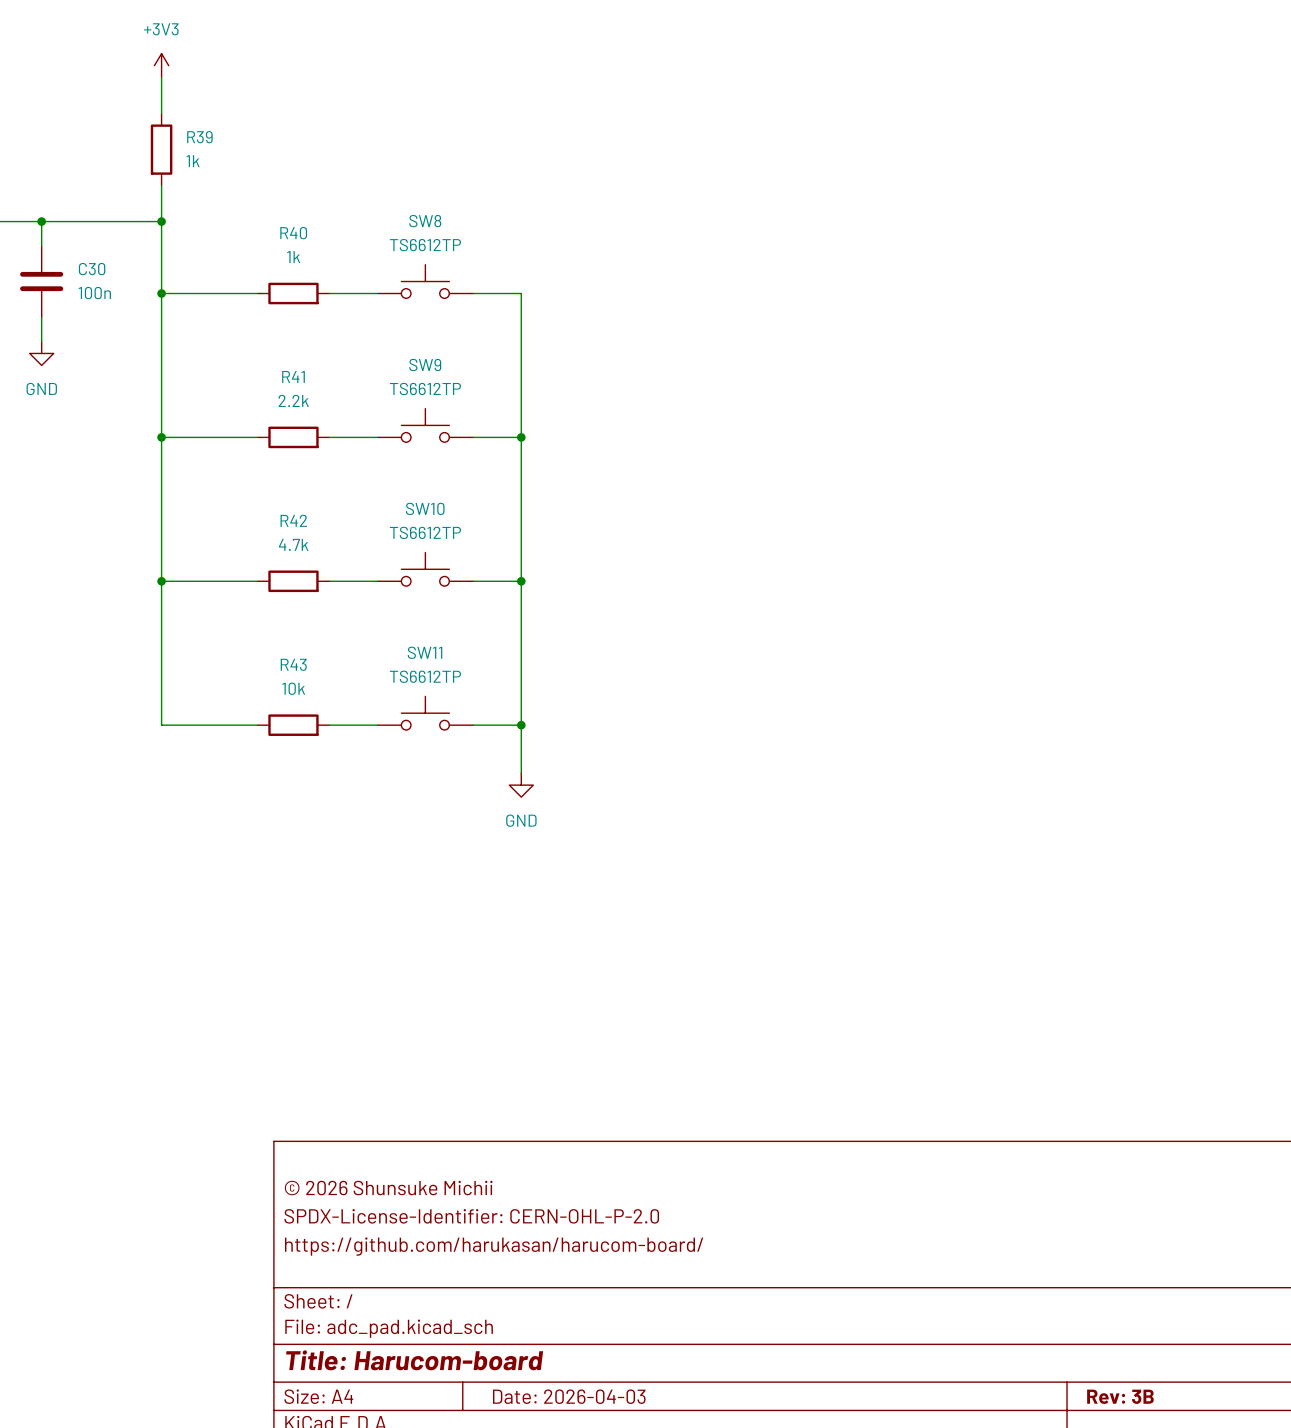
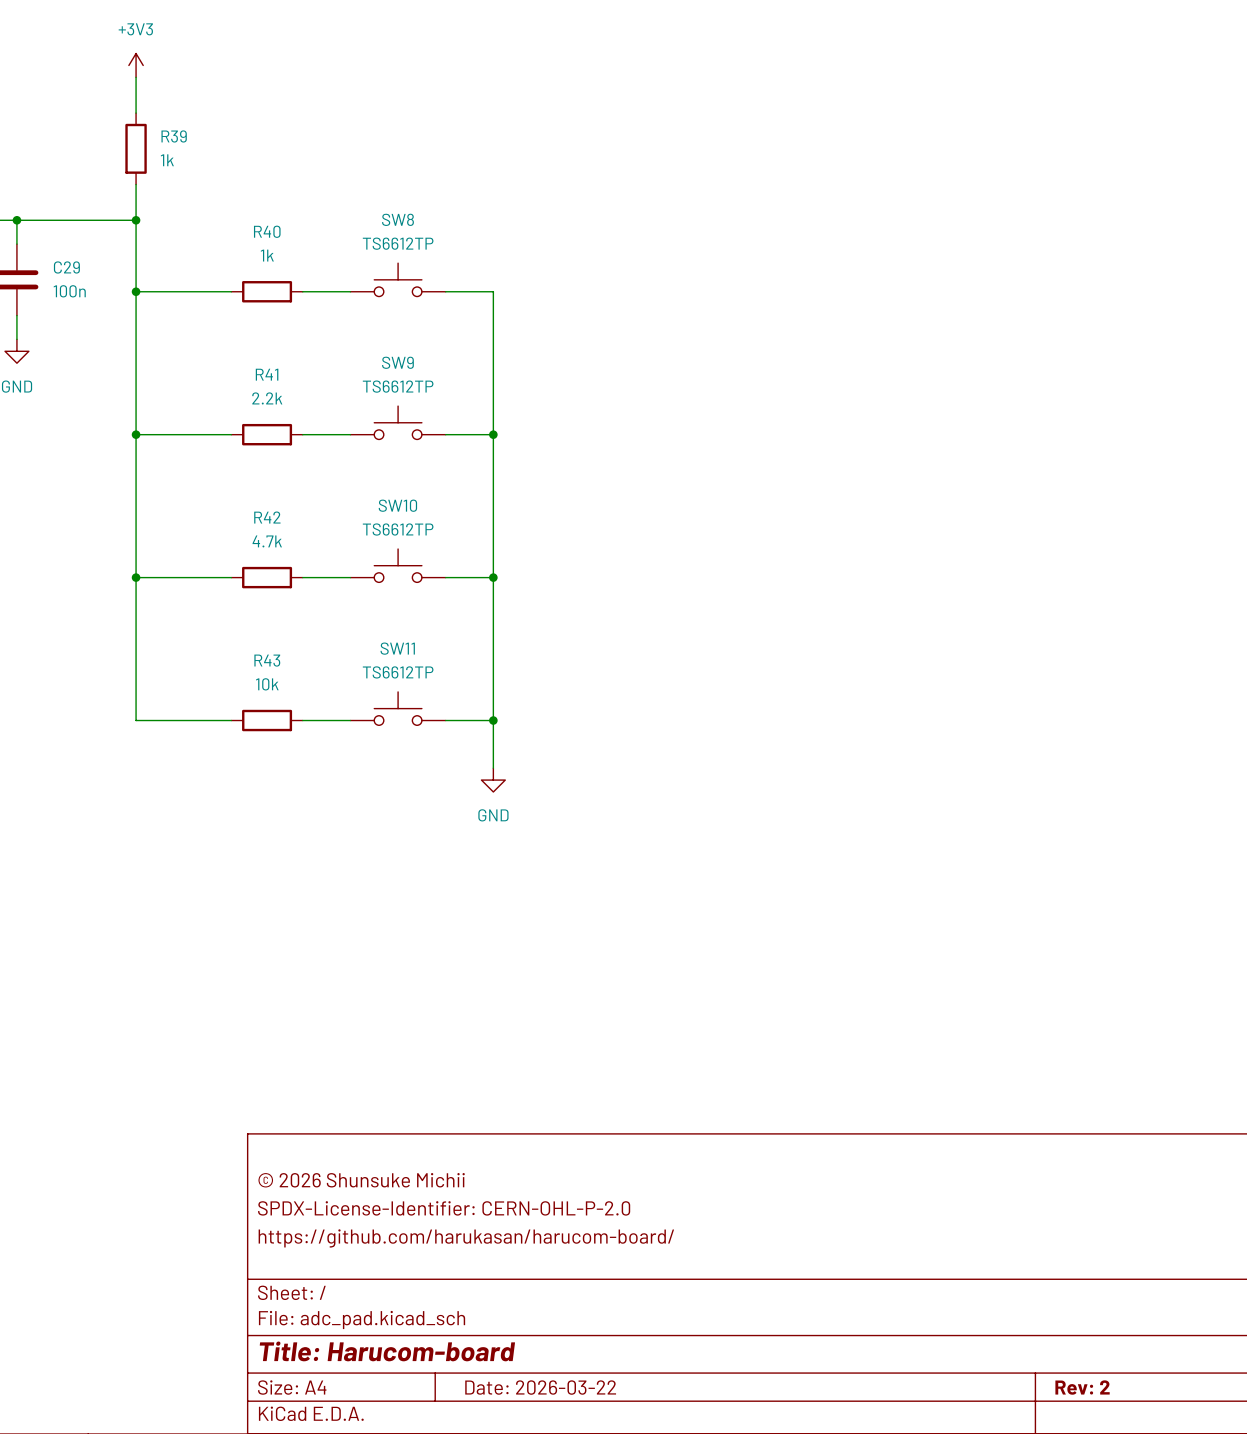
C30 name: C30 (92, 269) -> C29 (66, 267)
title block: Date: 2026-04-03 (569, 1396) -> Date: 2026-03-22 (540, 1387)
title block: Rev: 3B (1120, 1396) -> Rev: 2 (1082, 1387)

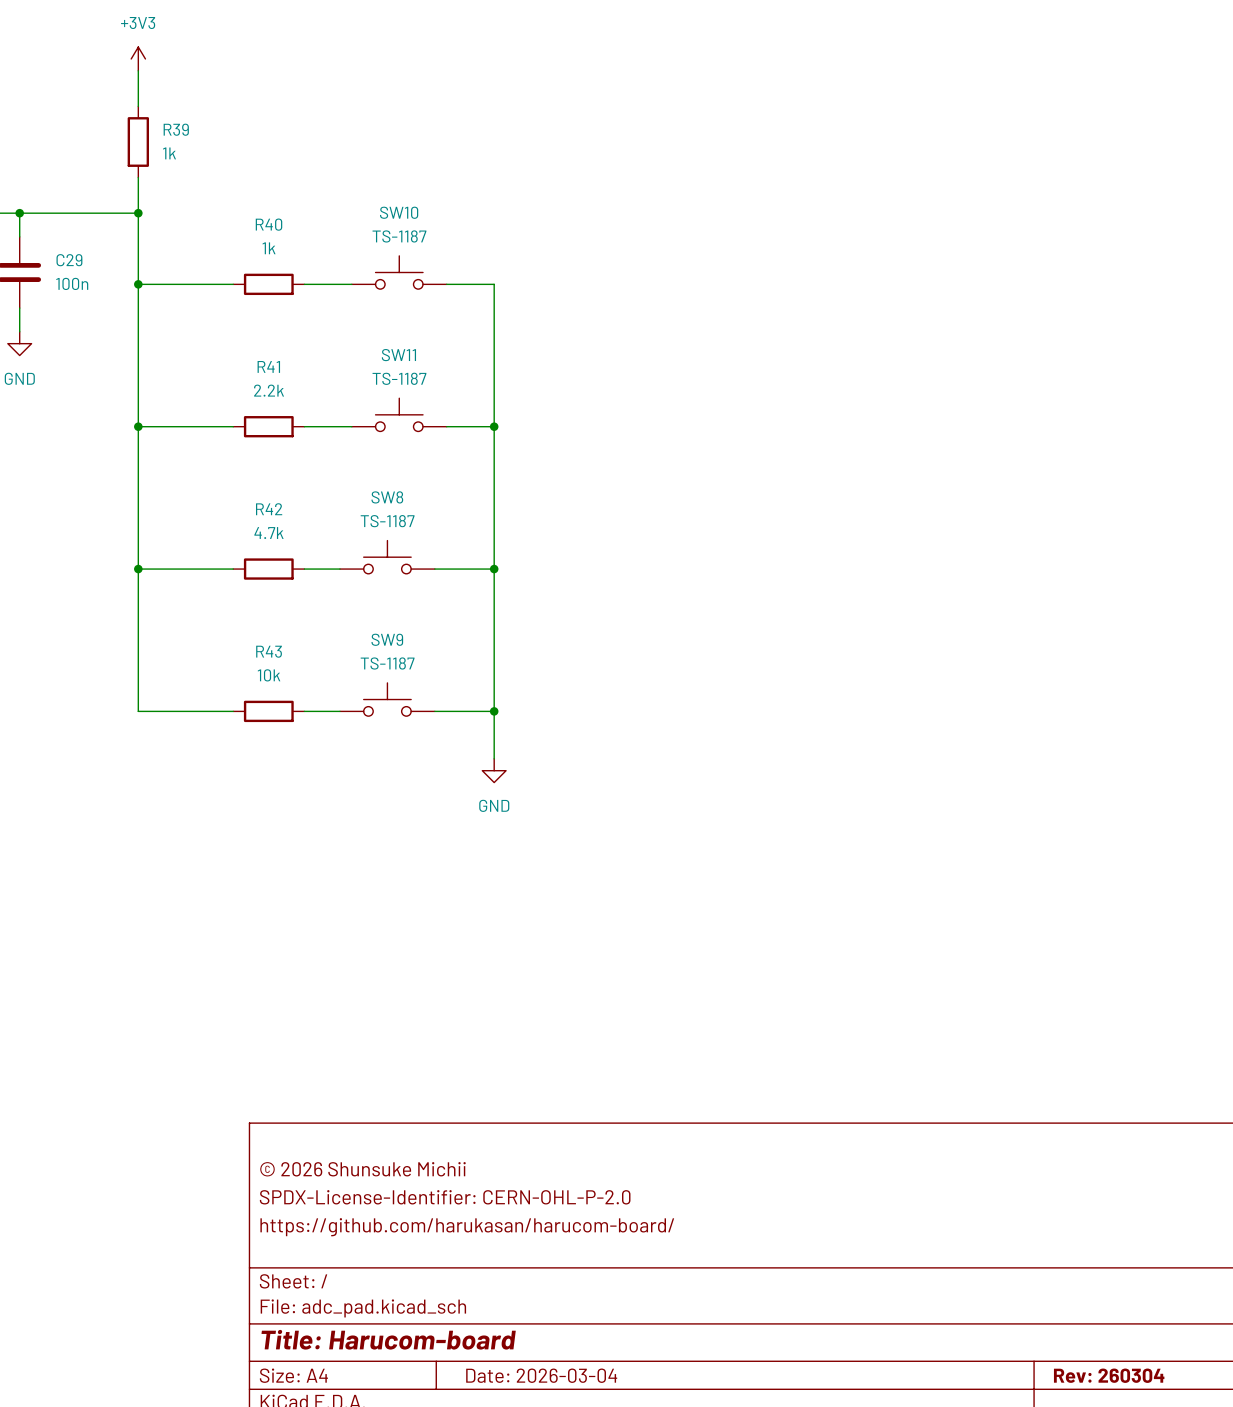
SW8 name: SW8 (398, 219) -> SW10 (399, 212)
SW8 value: TS6612TP (398, 243) -> TS-1187 (399, 236)
SW9 name: SW9 (397, 362) -> SW11 (398, 355)
SW9 value: TS6612TP (398, 386) -> TS-1187 (399, 378)
SW8: none -> TS-1187 (387, 557)
SW10: TS6612TP (398, 565) -> none
SW9: none -> TS-1187 (387, 699)
SW11: TS6612TP (398, 708) -> none
title block: Date: 2026-03-22 (540, 1387) -> Date: 2026-03-04 (541, 1375)
title block: Rev: 2 (1082, 1387) -> Rev: 260304 (1109, 1375)

